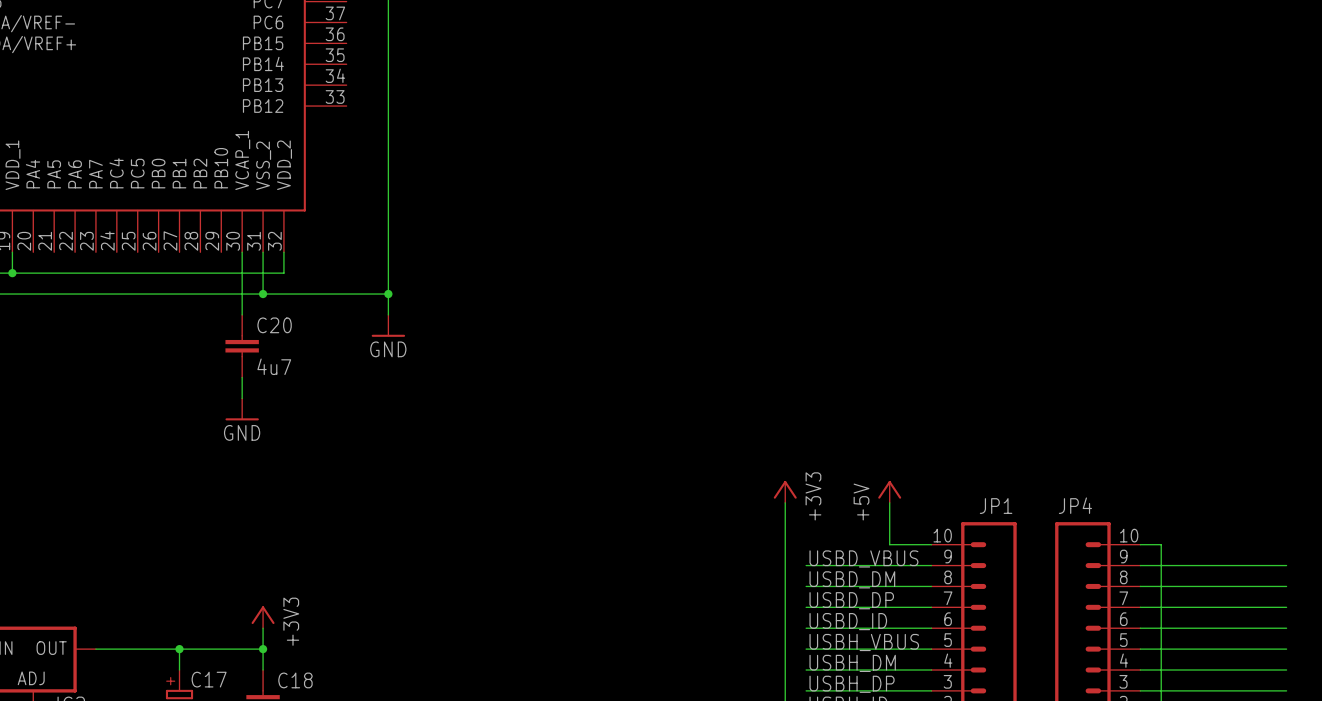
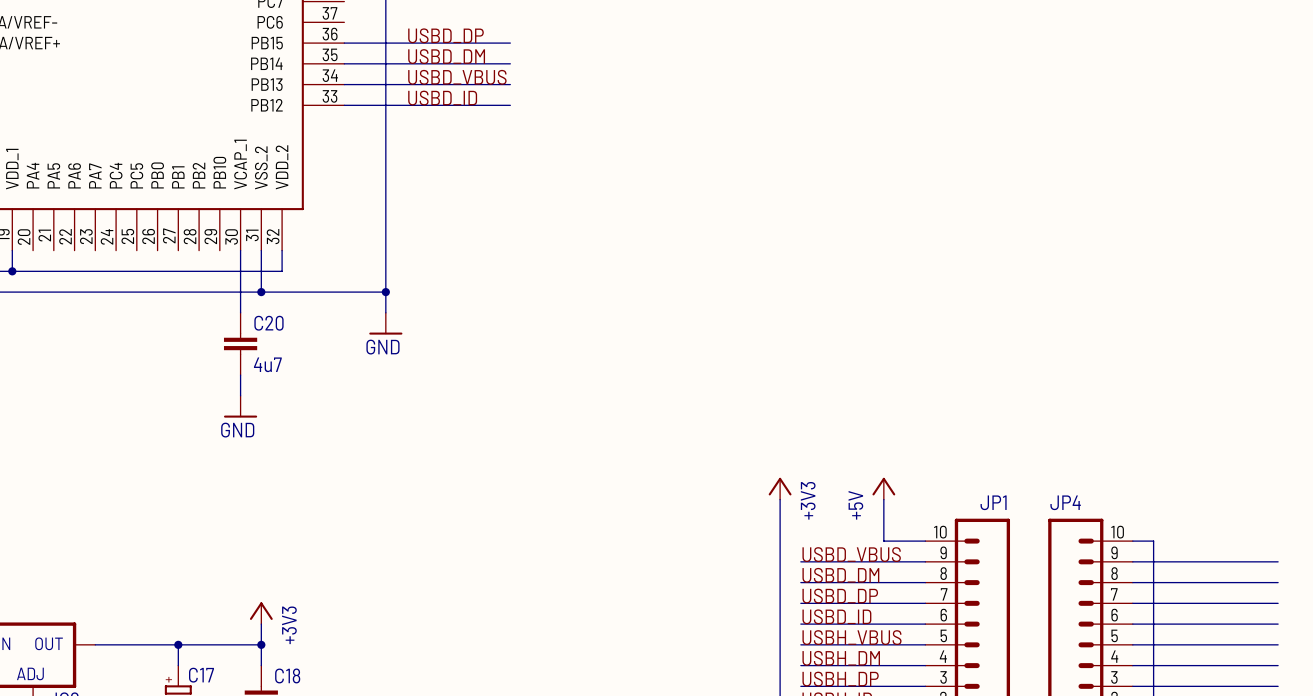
label: none -> USBD_DP (445, 35)
wire: none -> (344, 43) (510, 43)
label: none -> USBD_DM (446, 56)
wire: none -> (344, 63) (510, 63)
label: none -> USBD_VBUS (457, 77)
wire: none -> (344, 84) (510, 84)
label: none -> USBD_ID (442, 98)
wire: none -> (344, 105) (510, 105)

